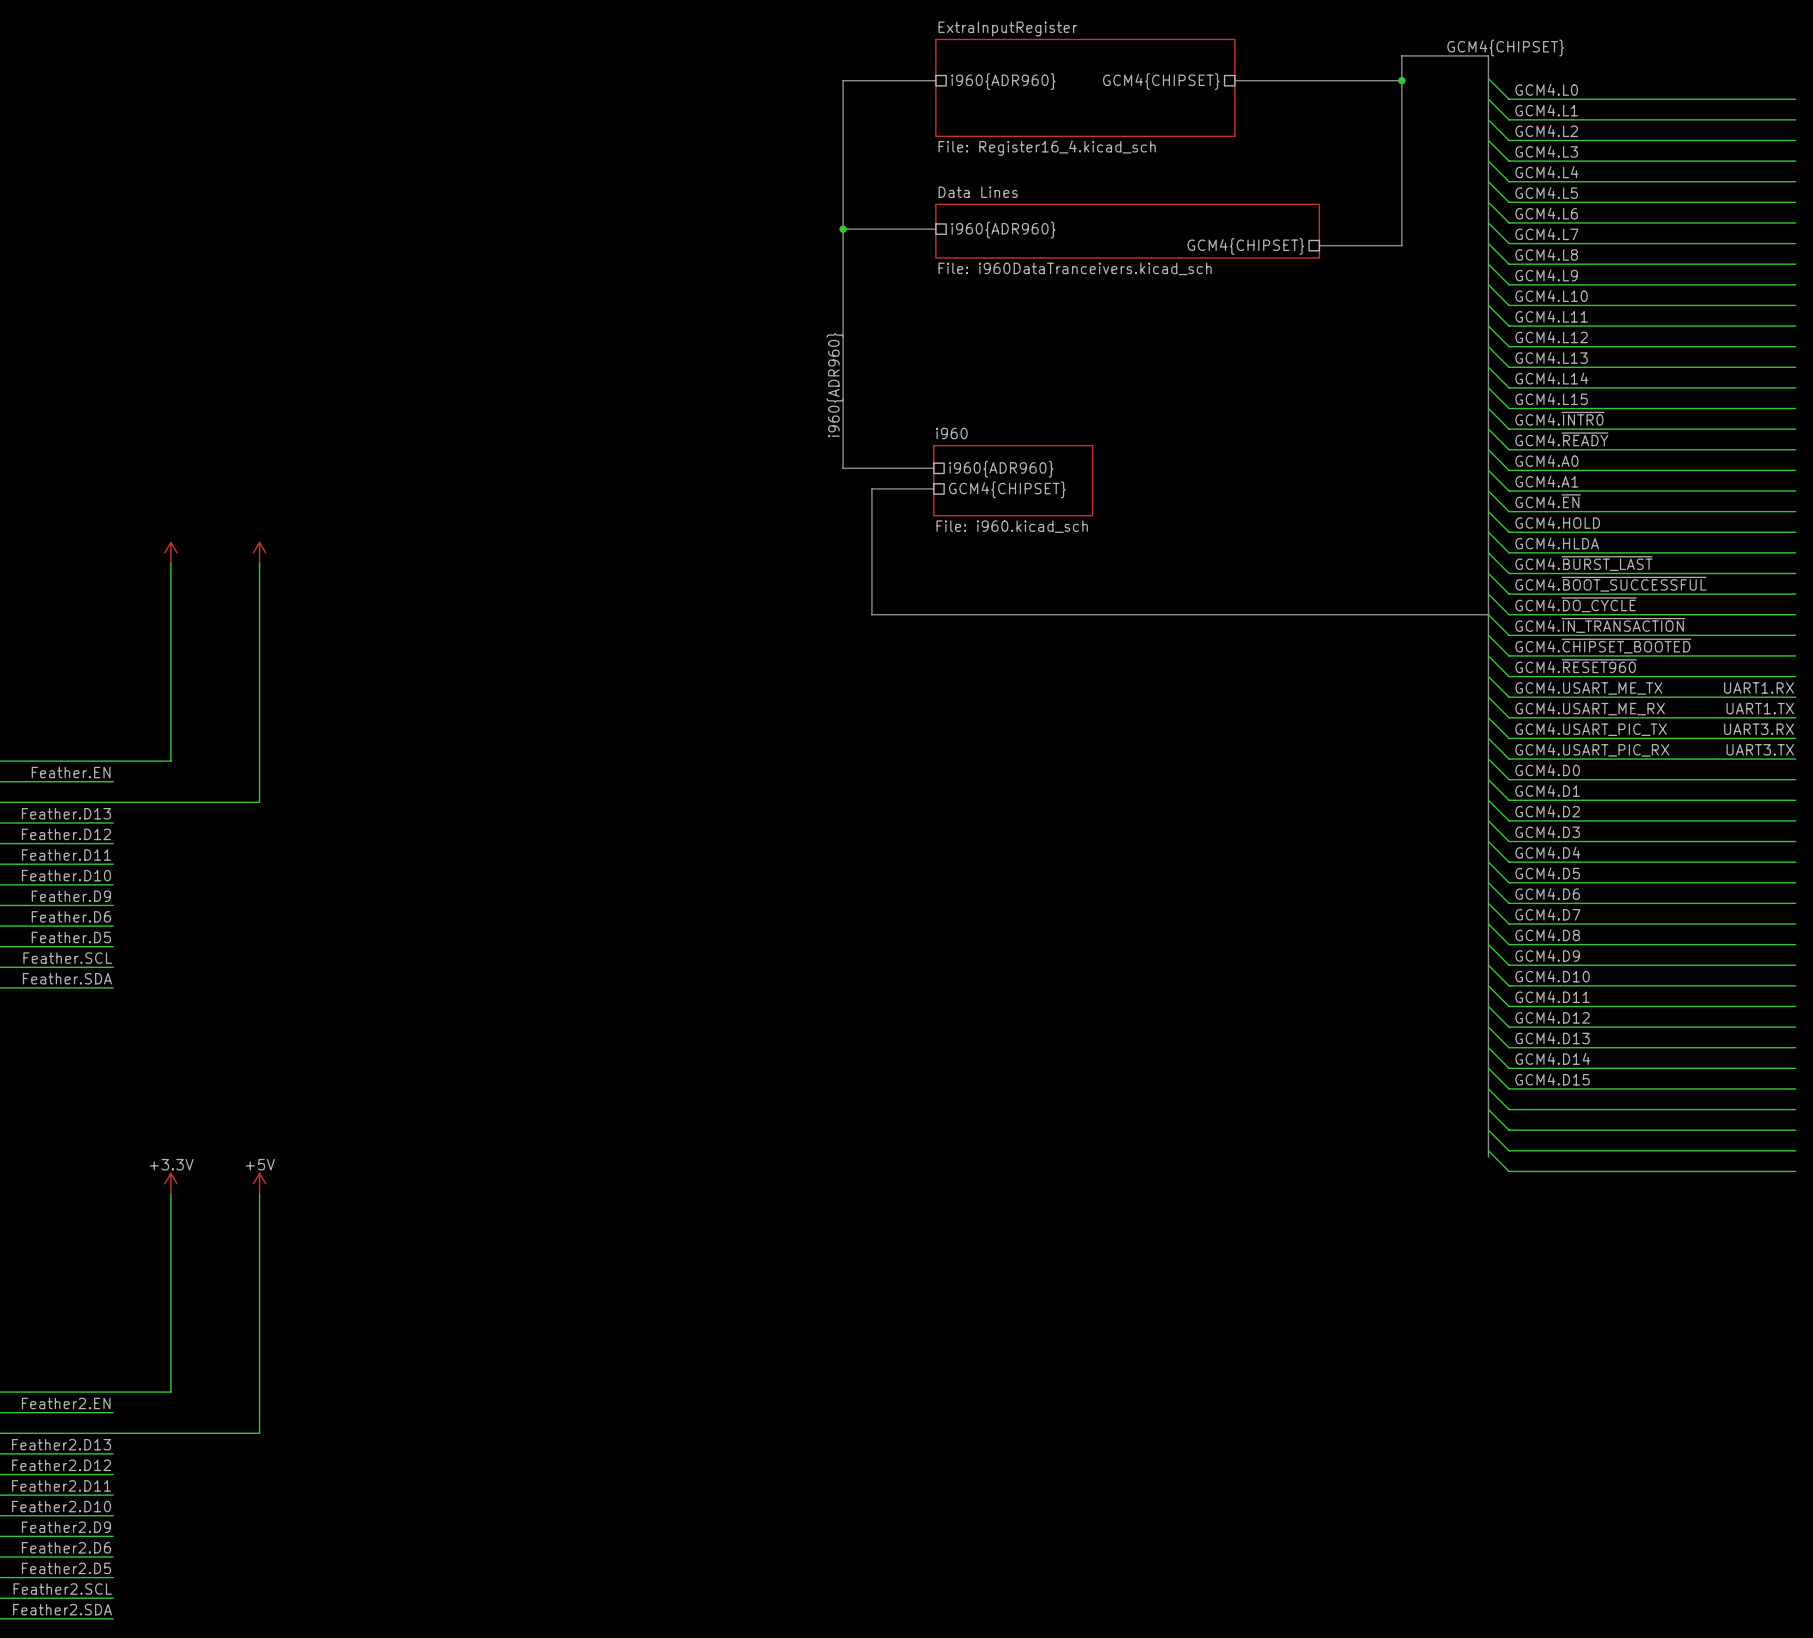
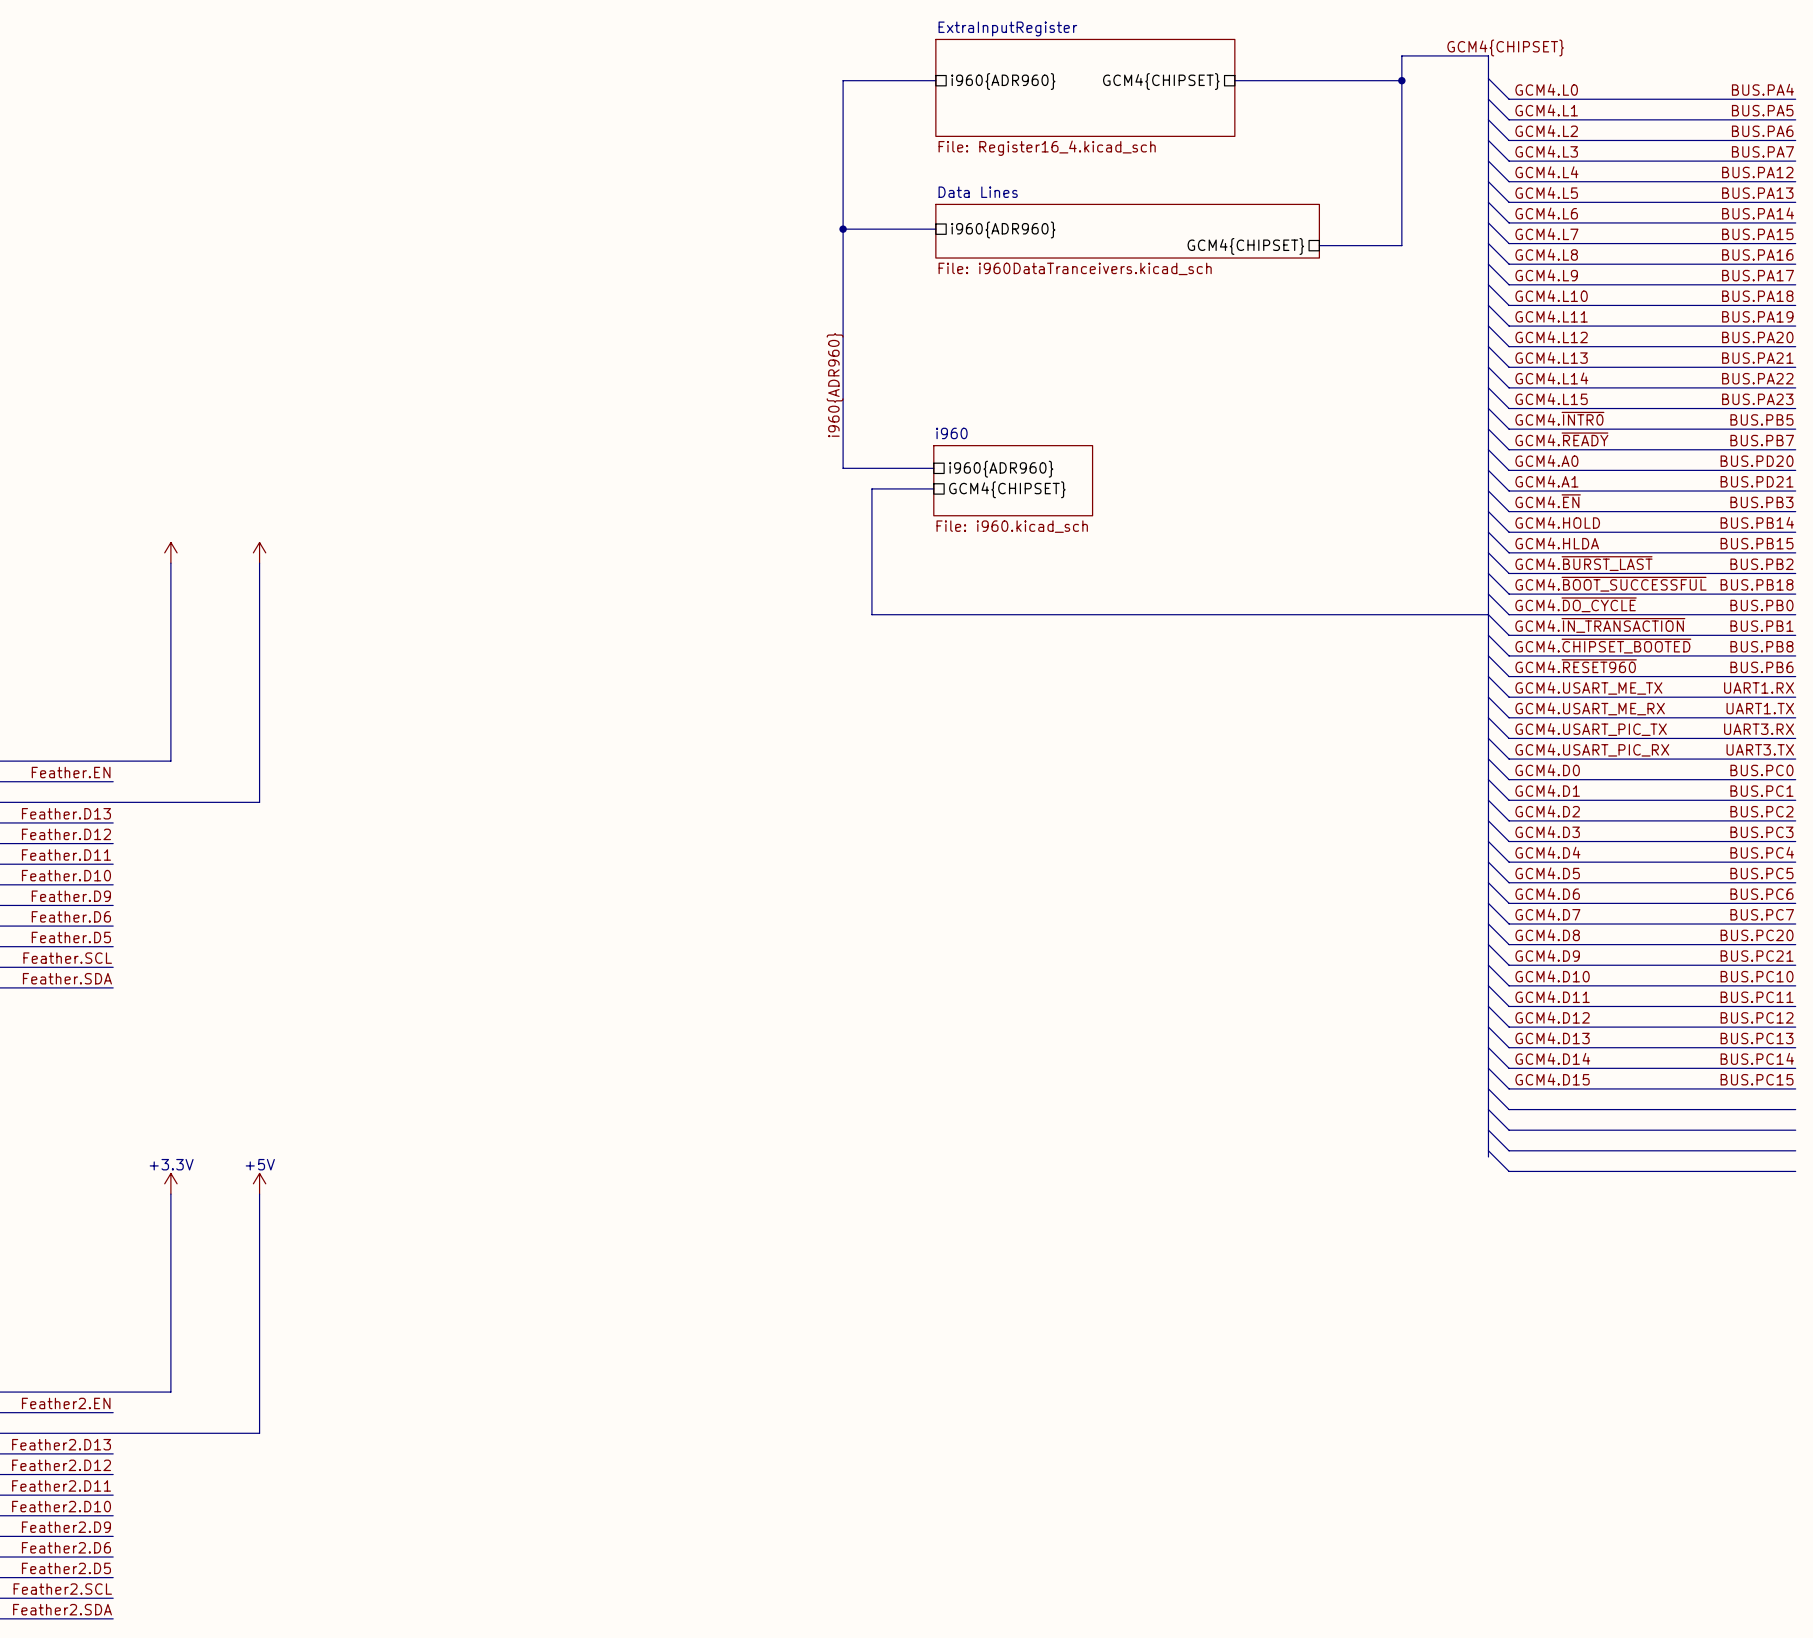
label: none -> BUS.PA4 (1762, 89)
label: none -> BUS.PA5 (1762, 110)
label: none -> BUS.PA6 (1762, 131)
label: none -> BUS.PA7 (1762, 151)
label: none -> BUS.PA12 (1757, 172)
label: none -> BUS.PA13 (1757, 193)
label: none -> BUS.PA14 (1758, 213)
label: none -> BUS.PA15 (1757, 234)
label: none -> BUS.PA16 (1757, 254)
label: none -> BUS.PA17 (1758, 275)
label: none -> BUS.PA18 (1757, 296)
label: none -> BUS.PA19 (1757, 316)
label: none -> BUS.PA20 (1757, 337)
label: none -> BUS.PA21 (1757, 358)
label: none -> BUS.PA22 (1757, 378)
label: none -> BUS.PA23 (1757, 399)
label: none -> BUS.PB5 (1761, 419)
label: none -> BUS.PB7 (1762, 440)
label: none -> BUS.PD20 (1757, 461)
label: none -> BUS.PD21 (1757, 481)
label: none -> BUS.PB3 (1761, 502)
label: none -> BUS.PB14 (1757, 522)
label: none -> BUS.PB15 (1757, 543)
label: none -> BUS.PB2 (1761, 564)
label: none -> BUS.PB18 (1757, 584)
label: none -> BUS.PB0 (1761, 605)
label: none -> BUS.PB1 (1761, 626)
label: none -> BUS.PB8 (1761, 646)
label: none -> BUS.PB6 (1761, 667)
label: none -> BUS.PC0 (1761, 770)
label: none -> BUS.PC1 (1761, 791)
label: none -> BUS.PC2 (1761, 811)
label: none -> BUS.PC3 (1761, 832)
label: none -> BUS.PC4 (1762, 852)
label: none -> BUS.PC5 (1761, 873)
label: none -> BUS.PC6 (1761, 894)
label: none -> BUS.PC7 (1762, 914)
label: none -> BUS.PC20 (1757, 935)
label: none -> BUS.PC21 (1757, 956)
label: none -> BUS.PC10 (1757, 976)
label: none -> BUS.PC11 (1757, 997)
label: none -> BUS.PC12 (1757, 1017)
label: none -> BUS.PC13 (1757, 1038)
label: none -> BUS.PC14 (1757, 1058)
label: none -> BUS.PC15 (1757, 1079)

